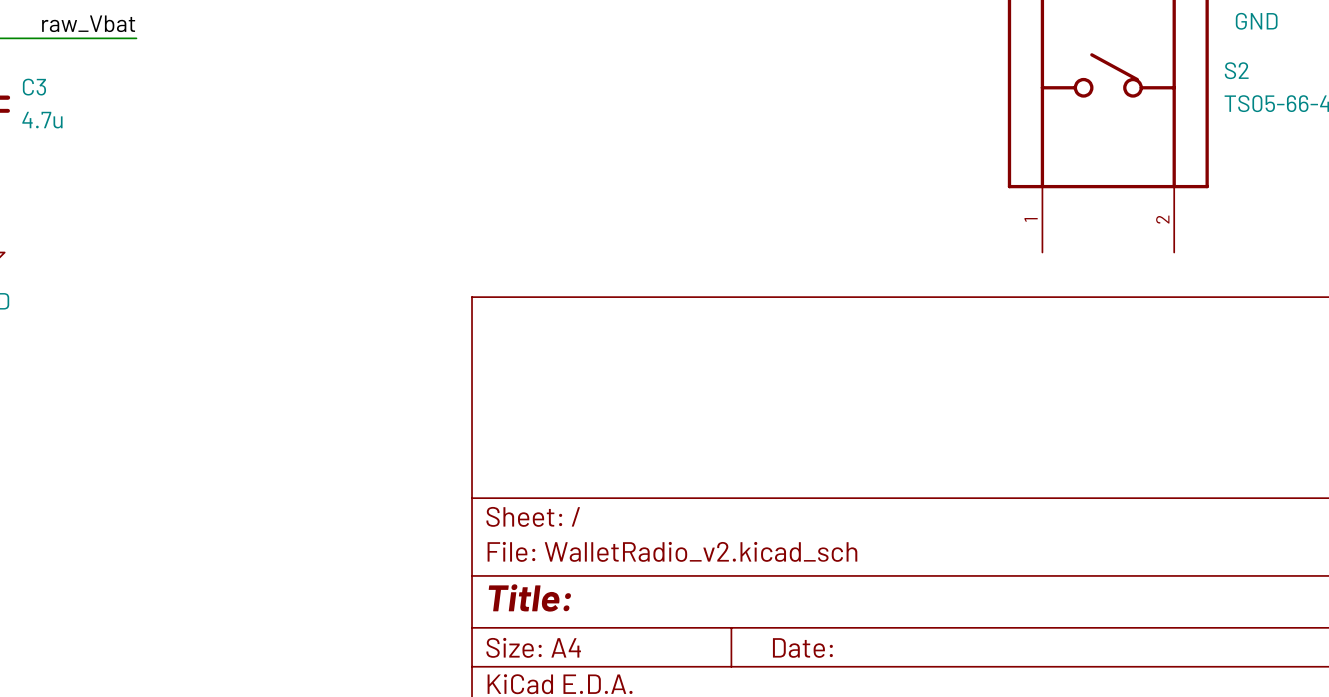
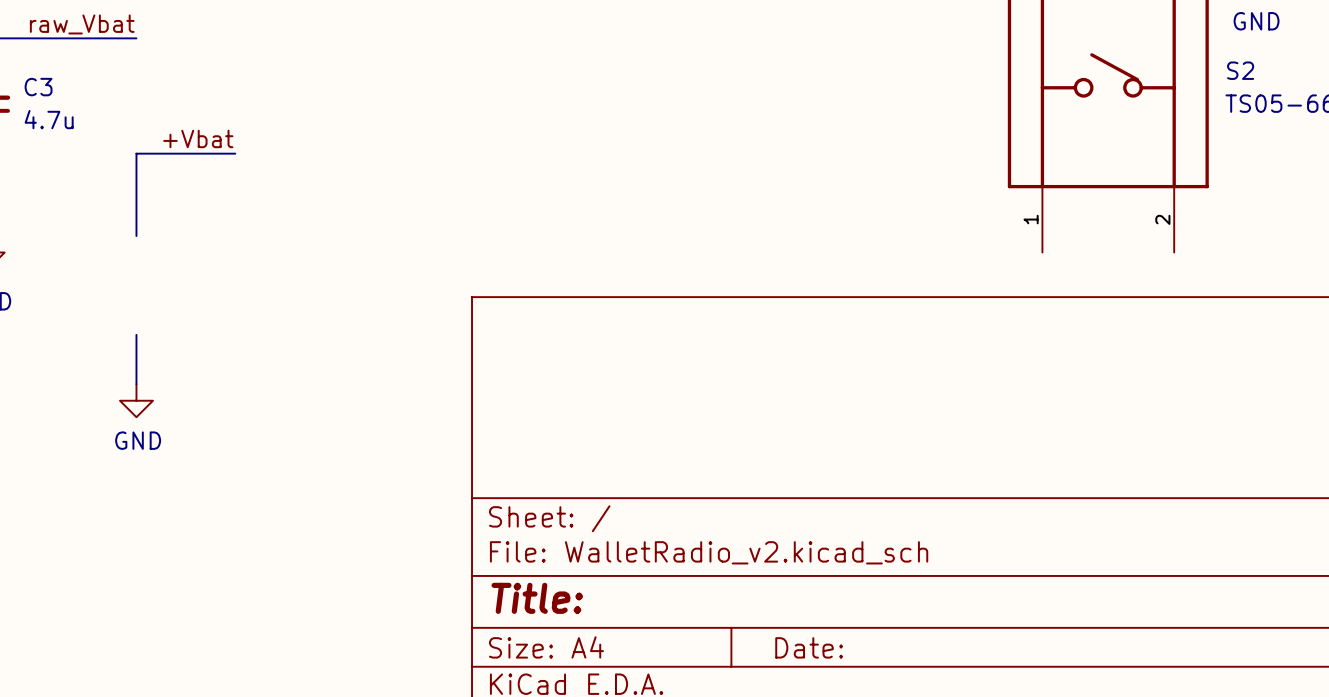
label: none -> +Vbat (198, 138)
wire: none -> (235, 153) (136, 153) (136, 236)
wire: none -> (136, 334) (136, 384)
power symbol: none -> GND (136, 400)

